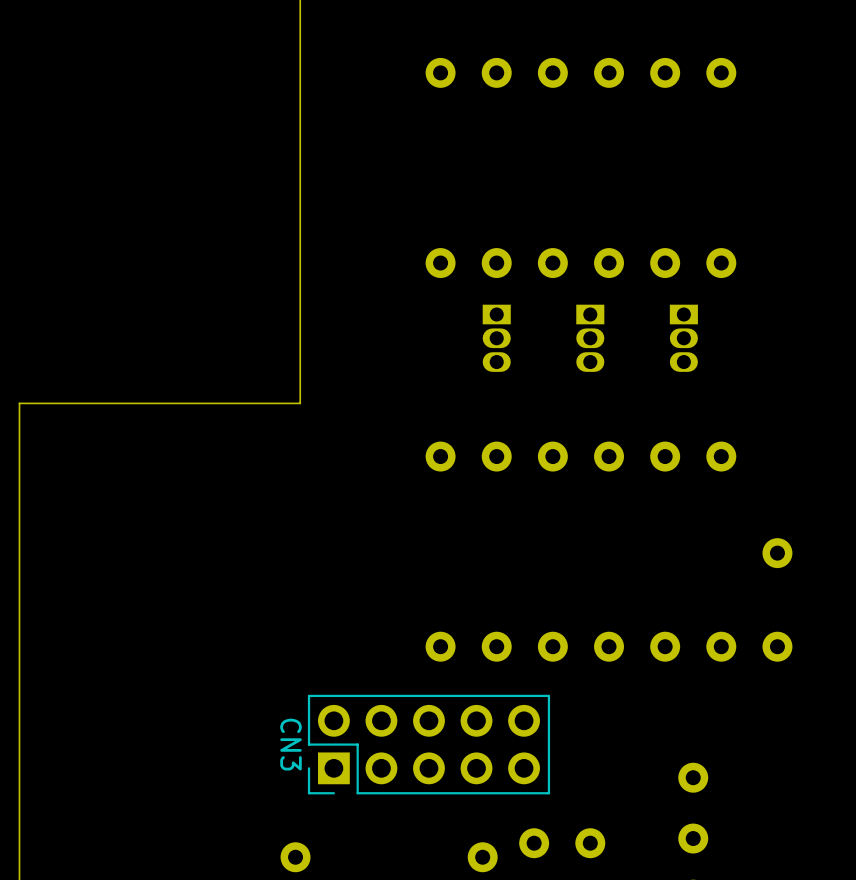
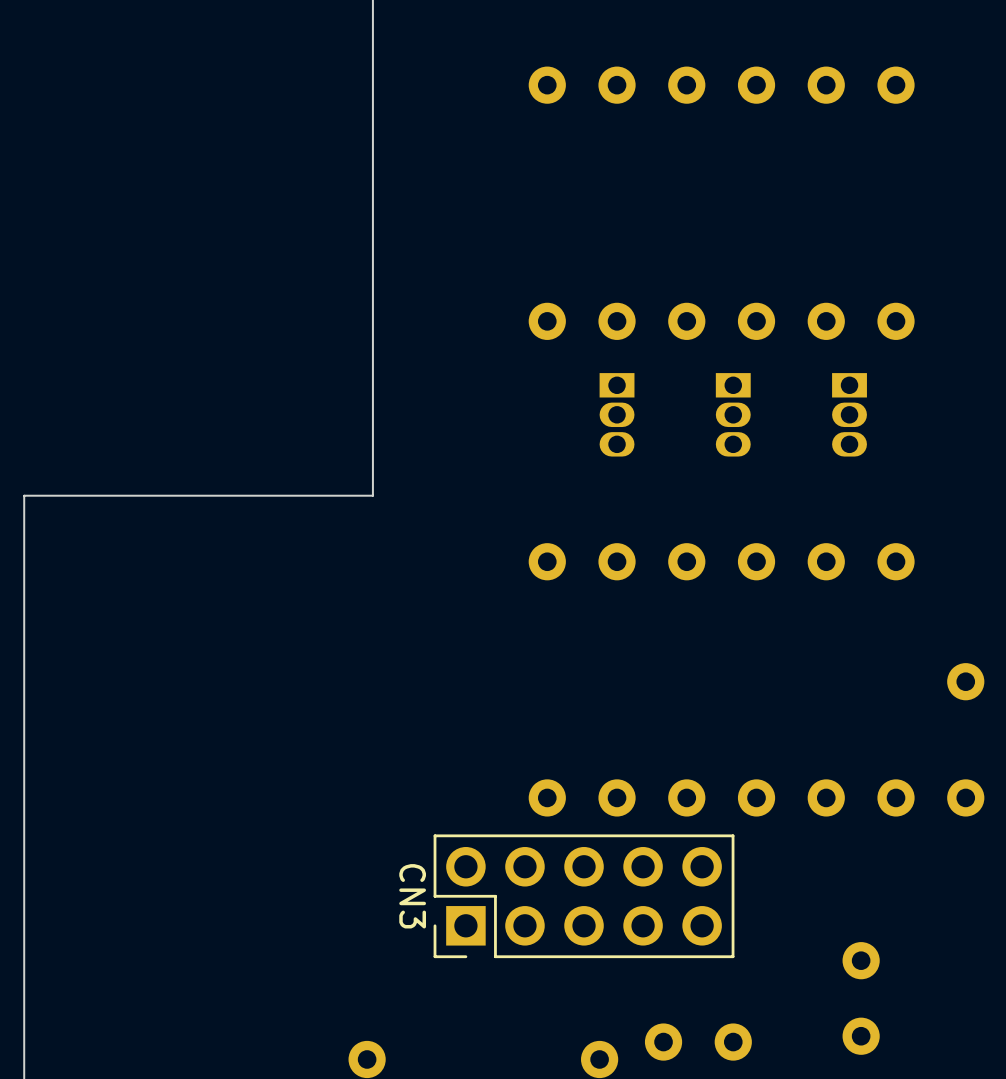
CN3 position: (428, 744) -> (584, 896)

